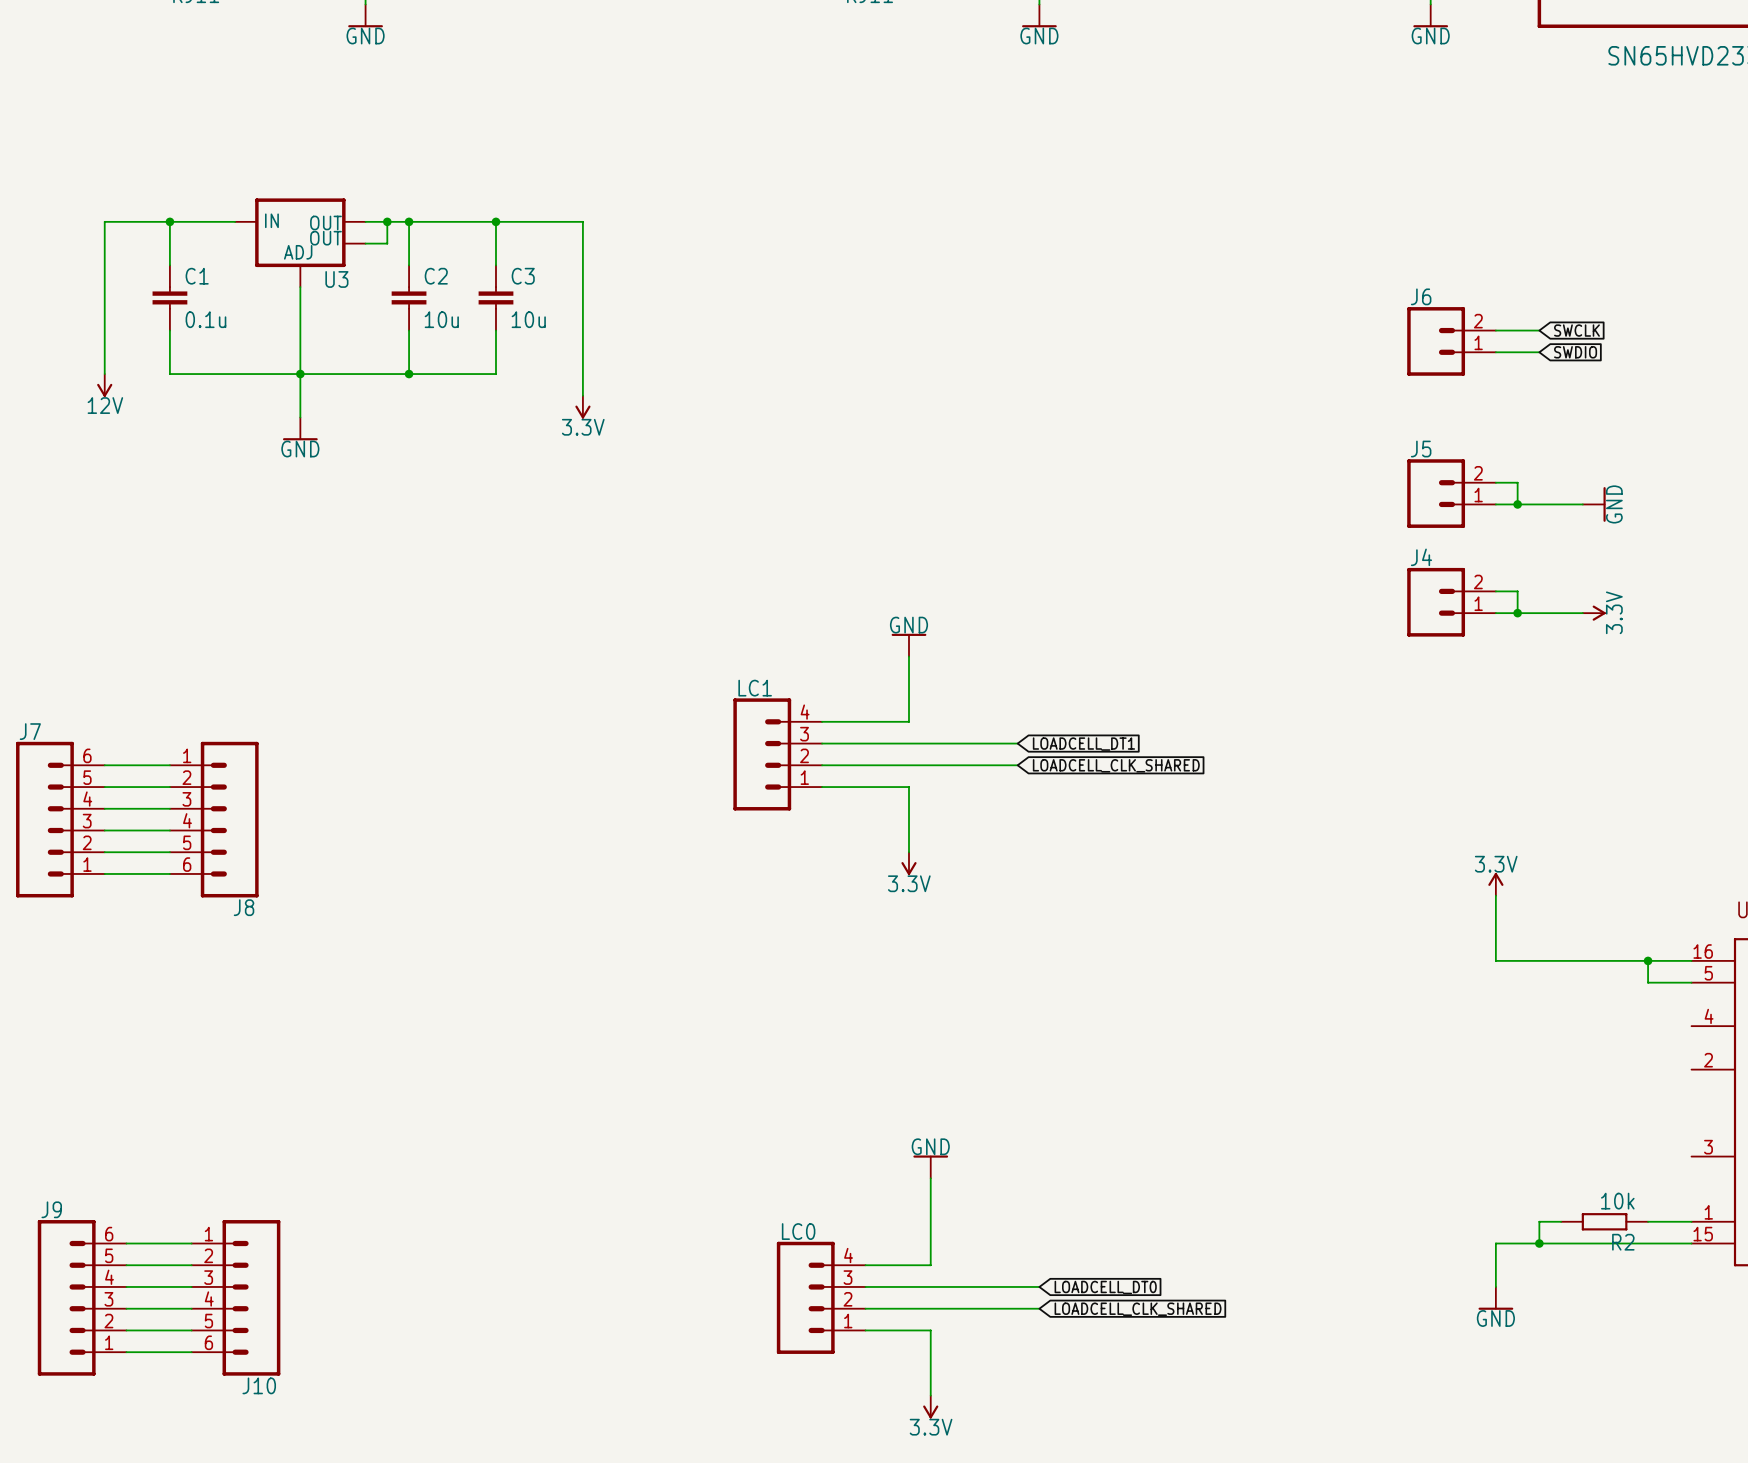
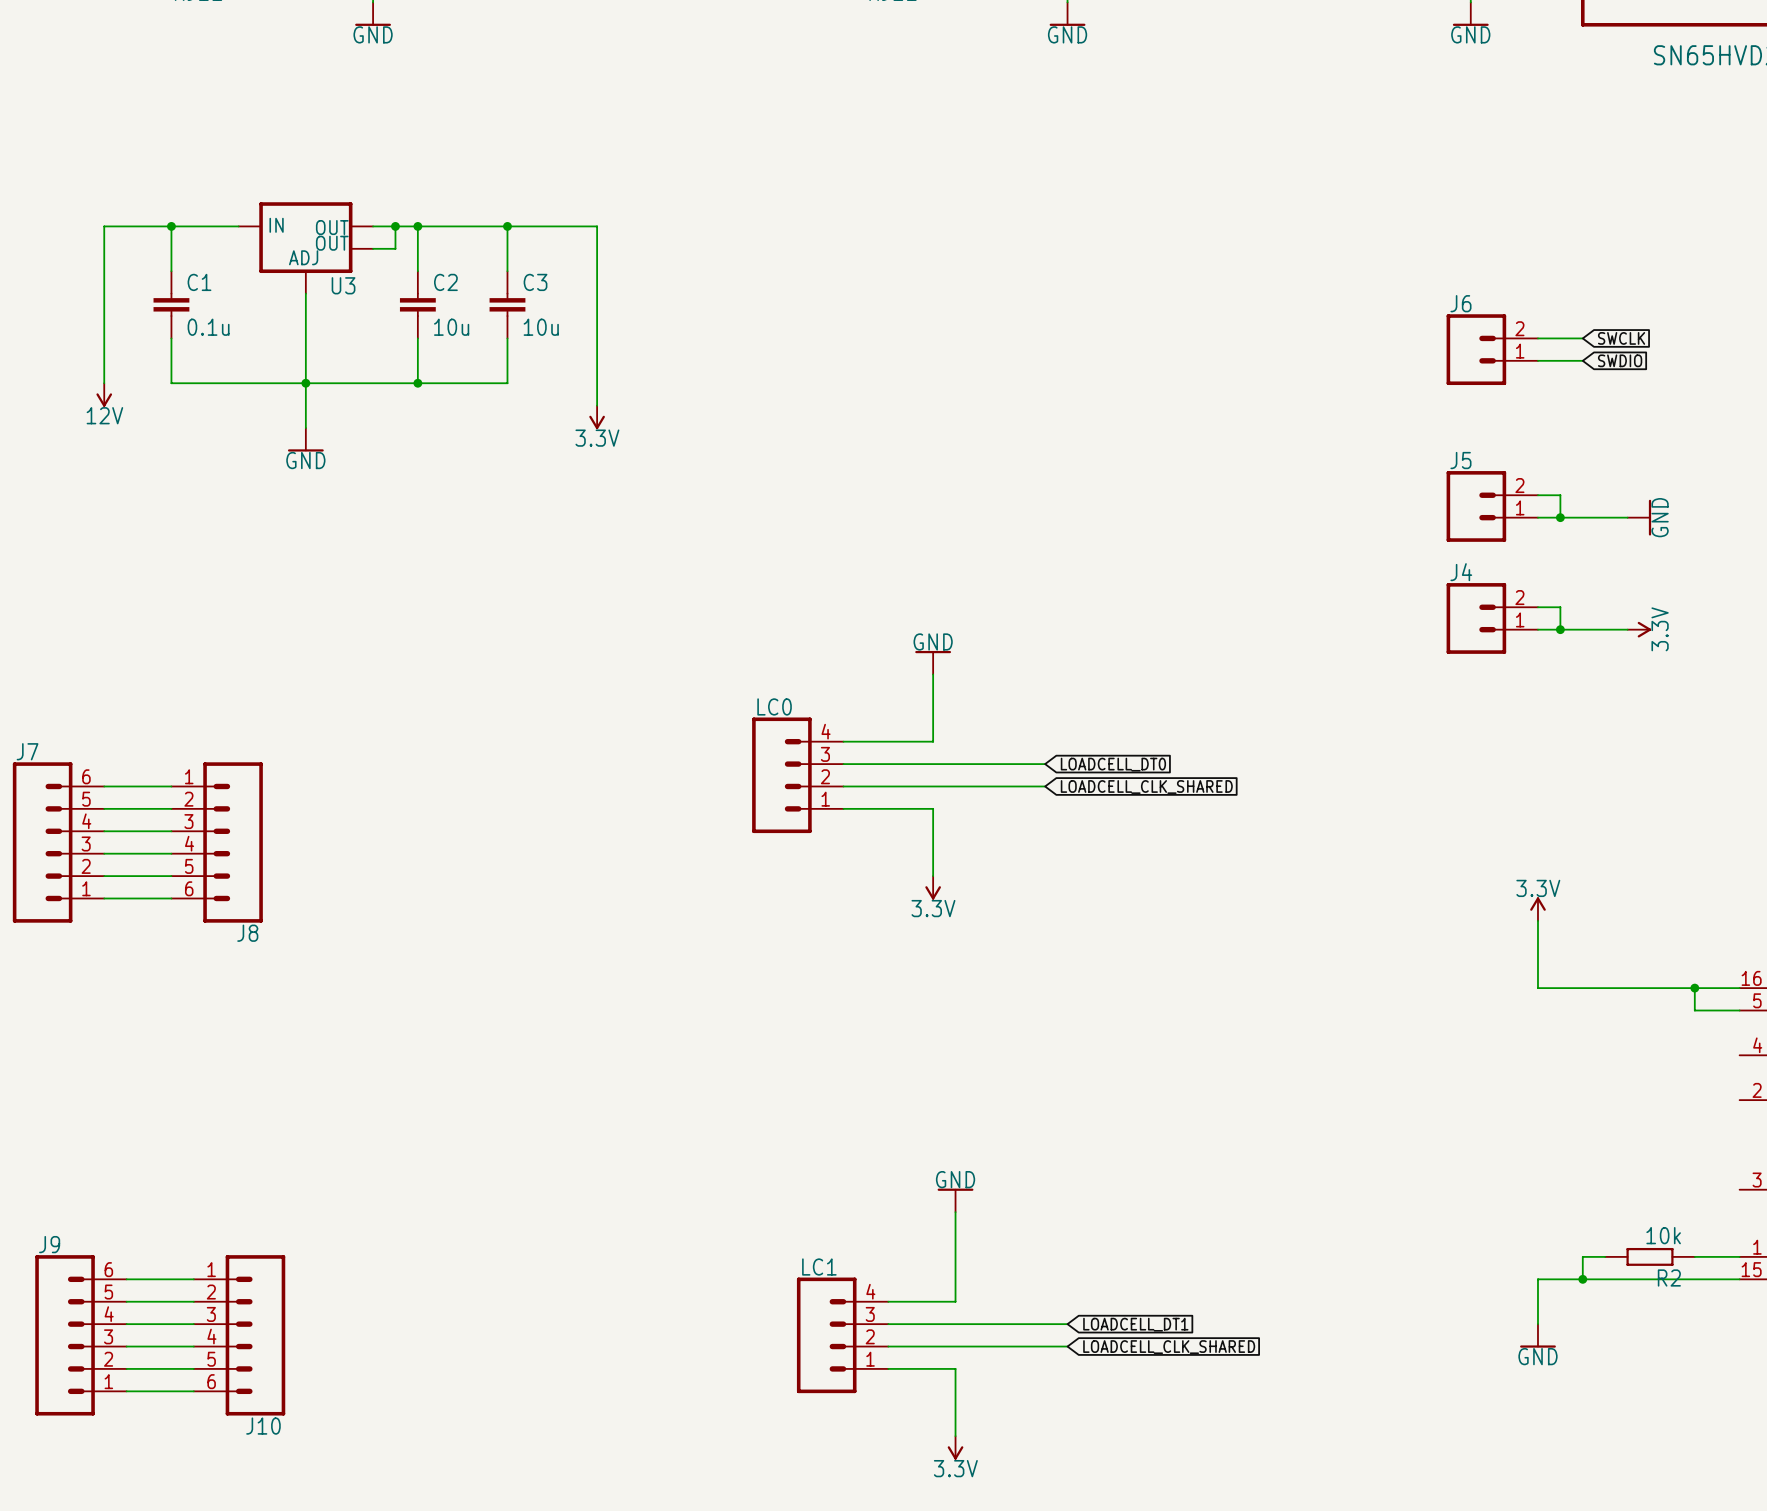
LC1 name: LC1 (755, 688) -> LC0 (774, 706)
global label: LOADCELL_DT1 (1083, 744) -> LOADCELL_DT0 (1113, 764)
LC0 name: LC0 (798, 1231) -> LC1 (819, 1267)
global label: LOADCELL_DT0 (1105, 1287) -> LOADCELL_DT1 (1135, 1324)

